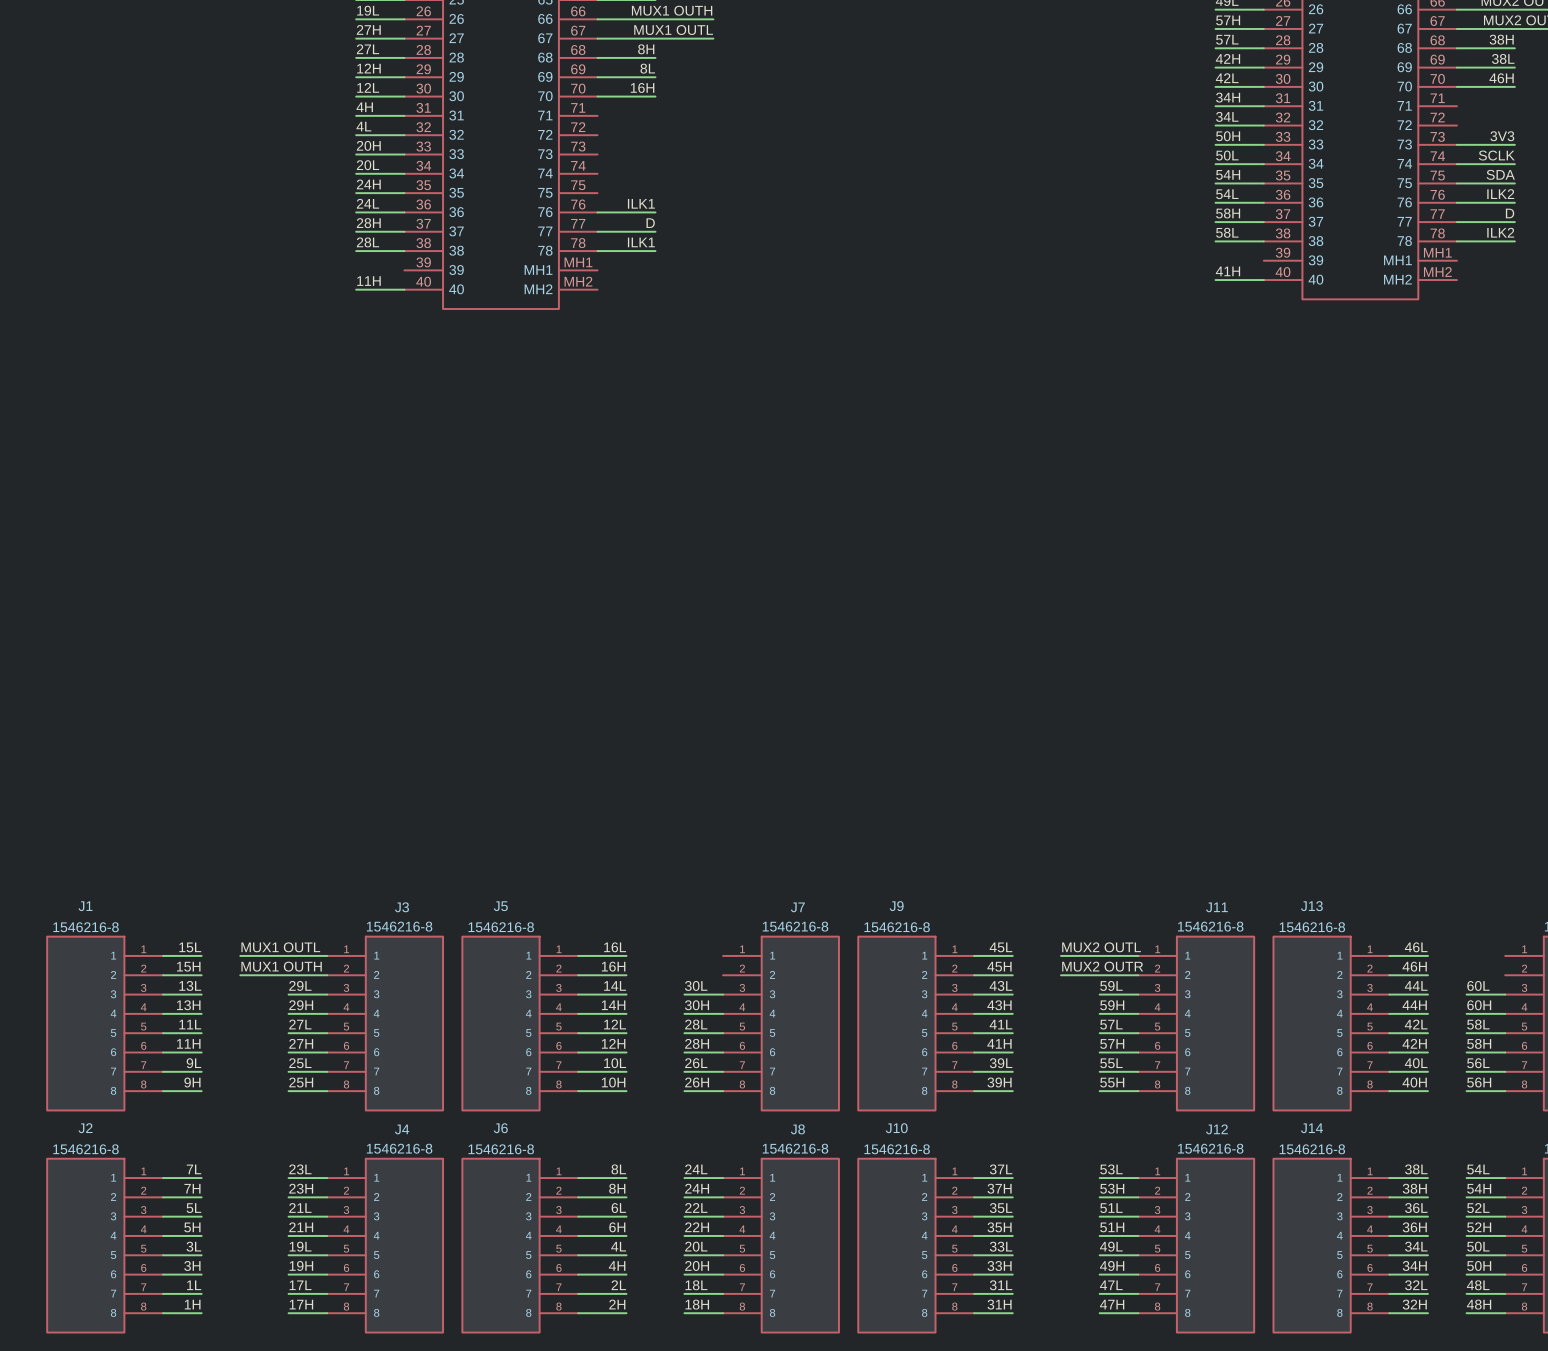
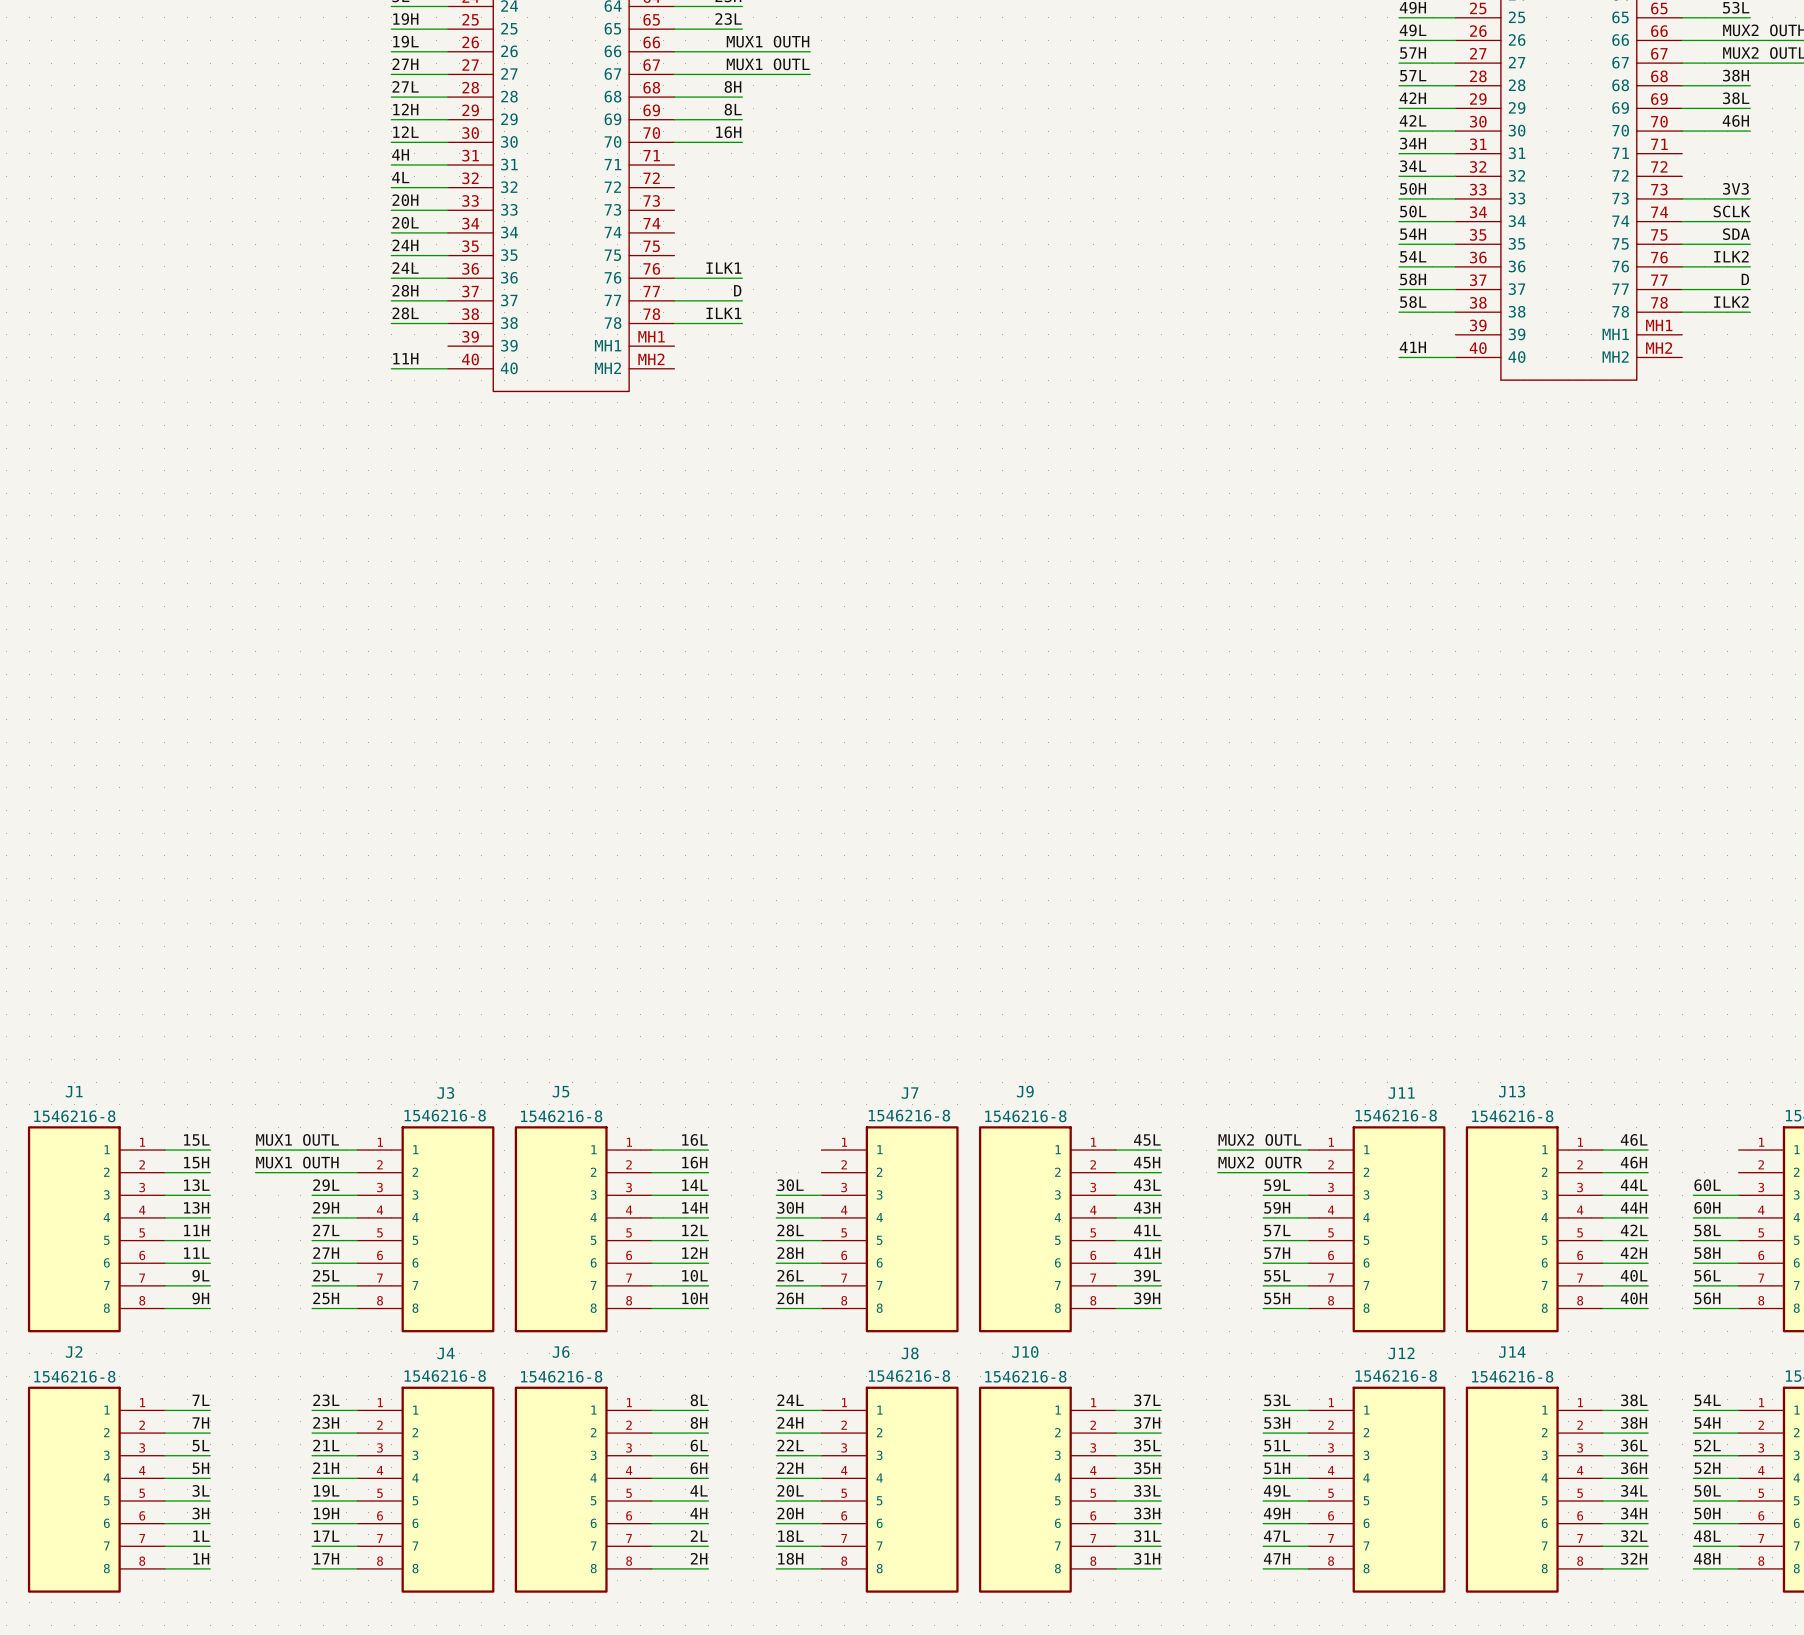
label: 11L (190, 1024) -> 11H (196, 1230)
label: 11H (188, 1043) -> 11L (196, 1253)

